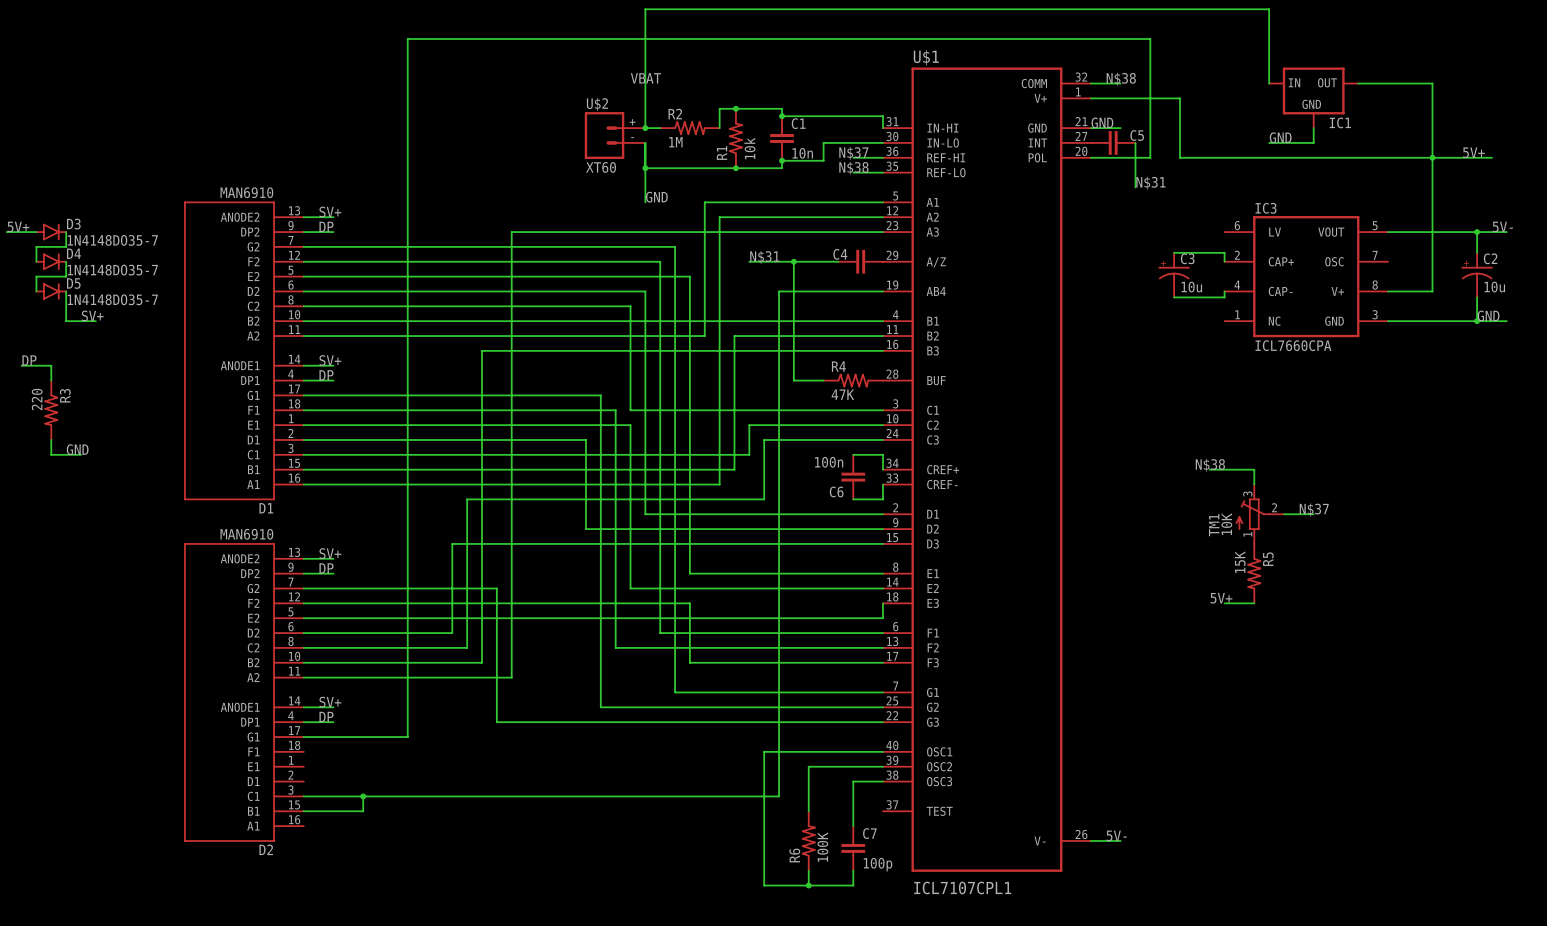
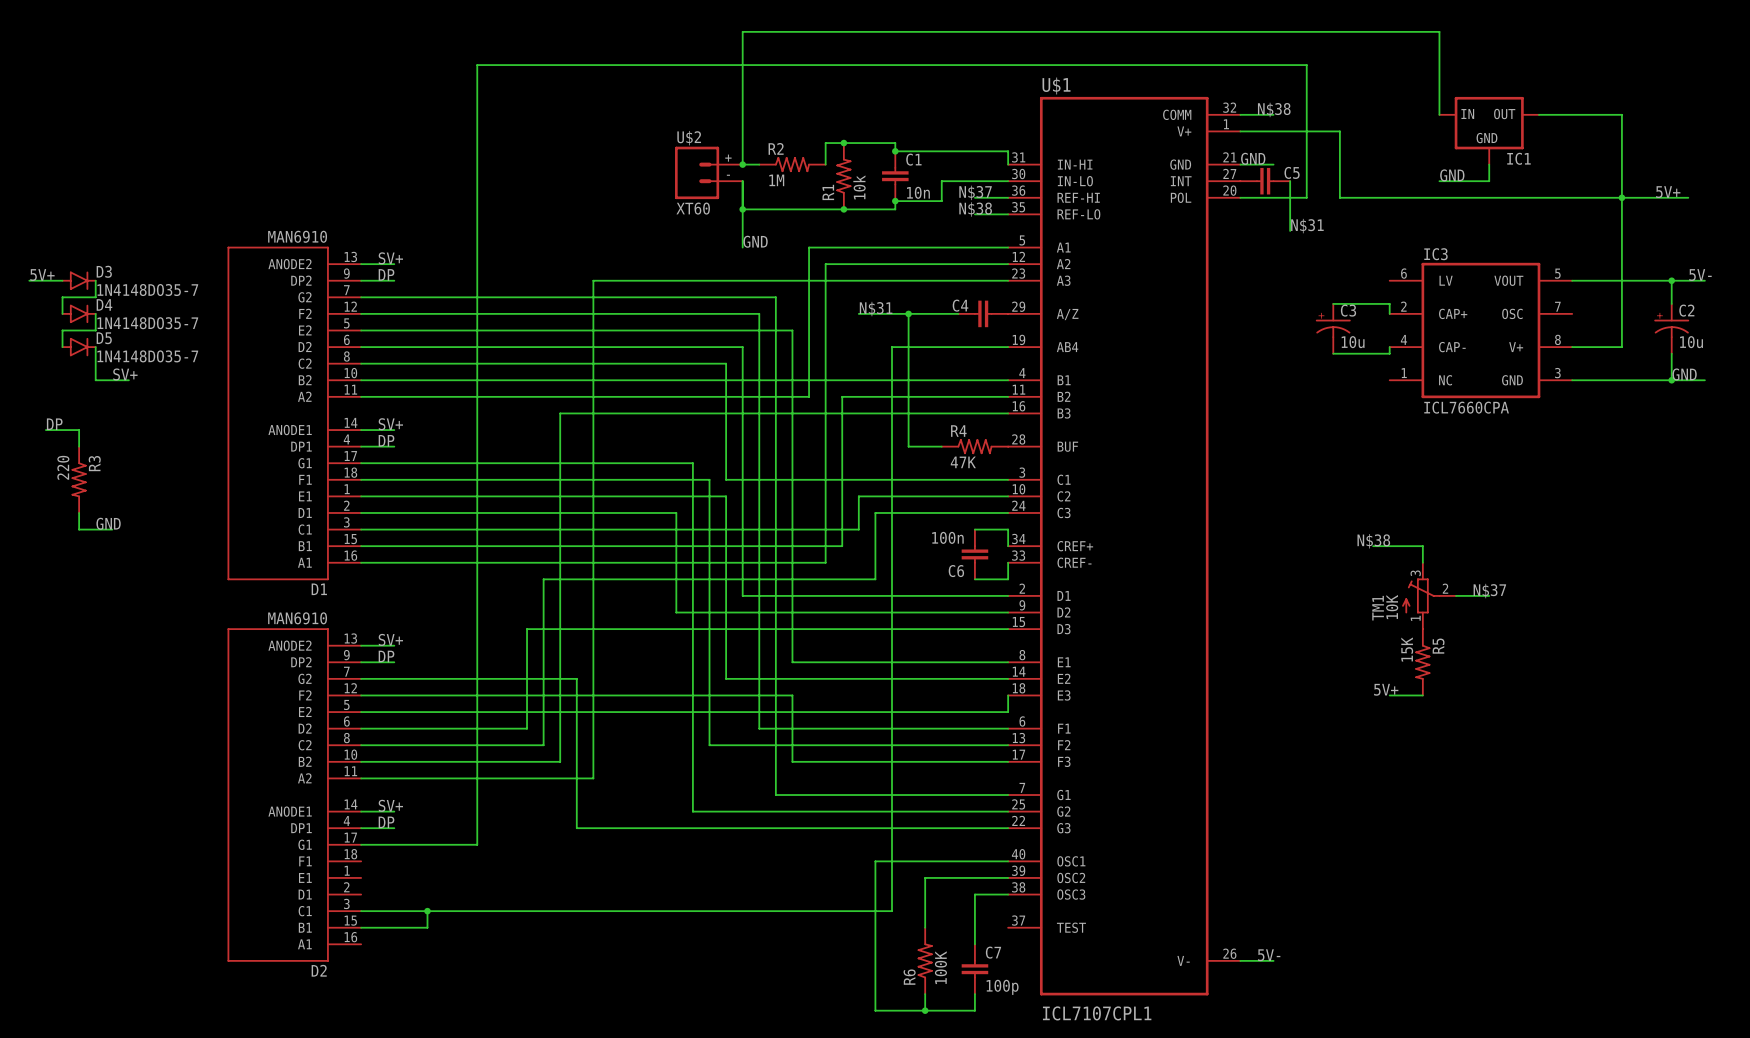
label: VBAT (646, 78) -> none

